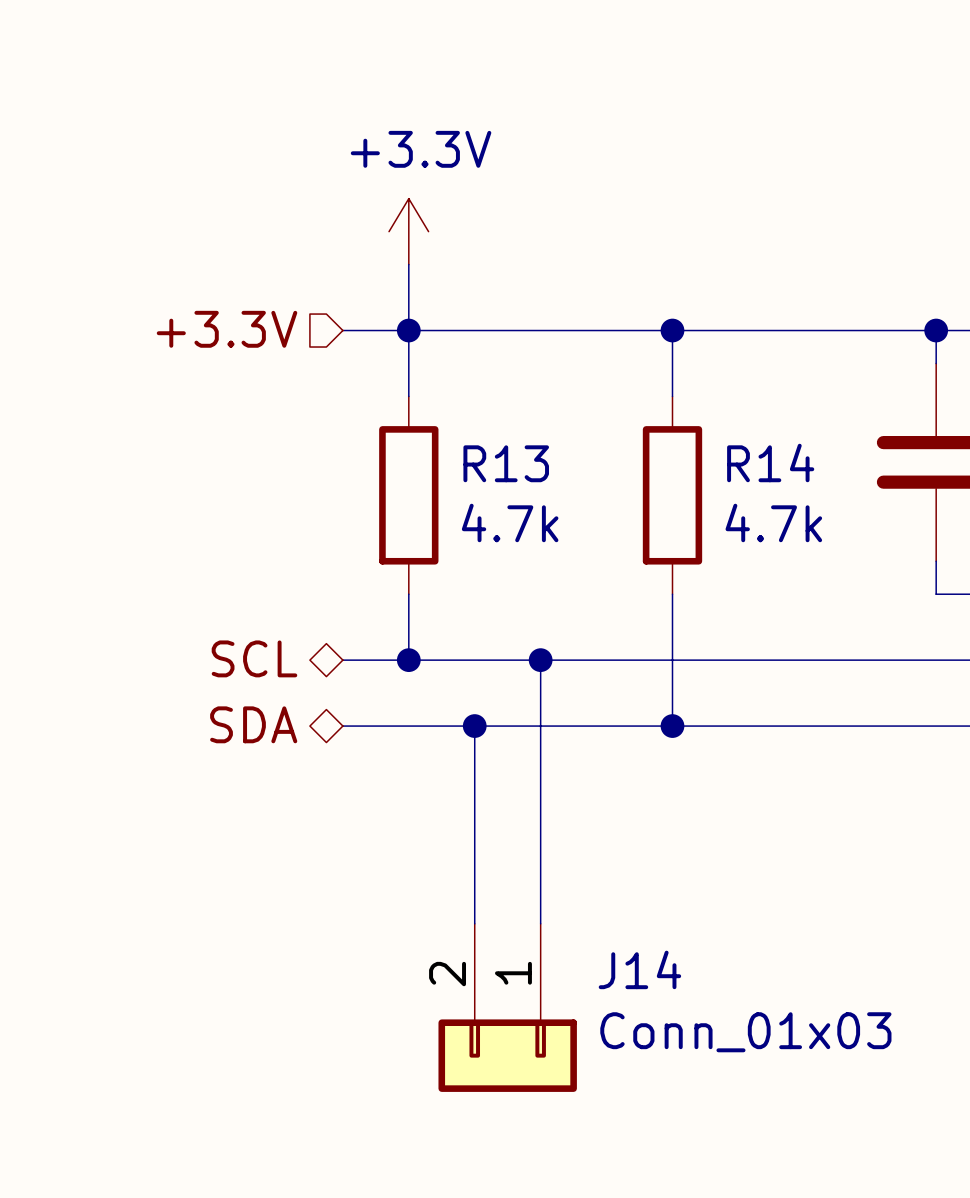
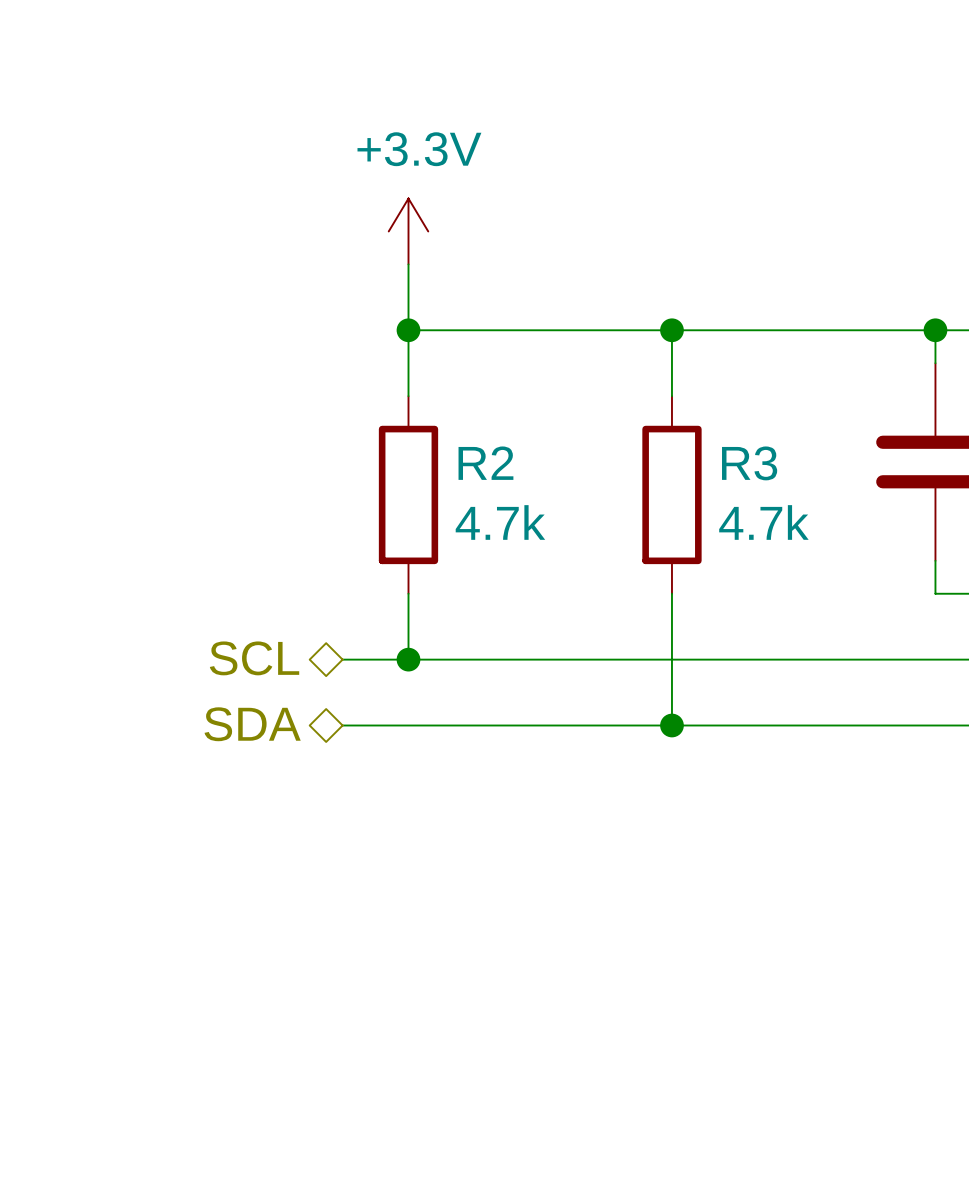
hierarchical label: +3.3V (227, 329) -> none
wire: (342, 330) (408, 330) -> none
R14 name: R14 (770, 462) -> R3 (749, 463)
R13 name: R13 (506, 463) -> R2 (485, 463)
wire: (540, 660) (540, 923) -> none
junction: (540, 660) -> none
wire: (474, 726) (474, 923) -> none
junction: (474, 726) -> none
J14: Conn_01x03 (507, 1007) -> none

